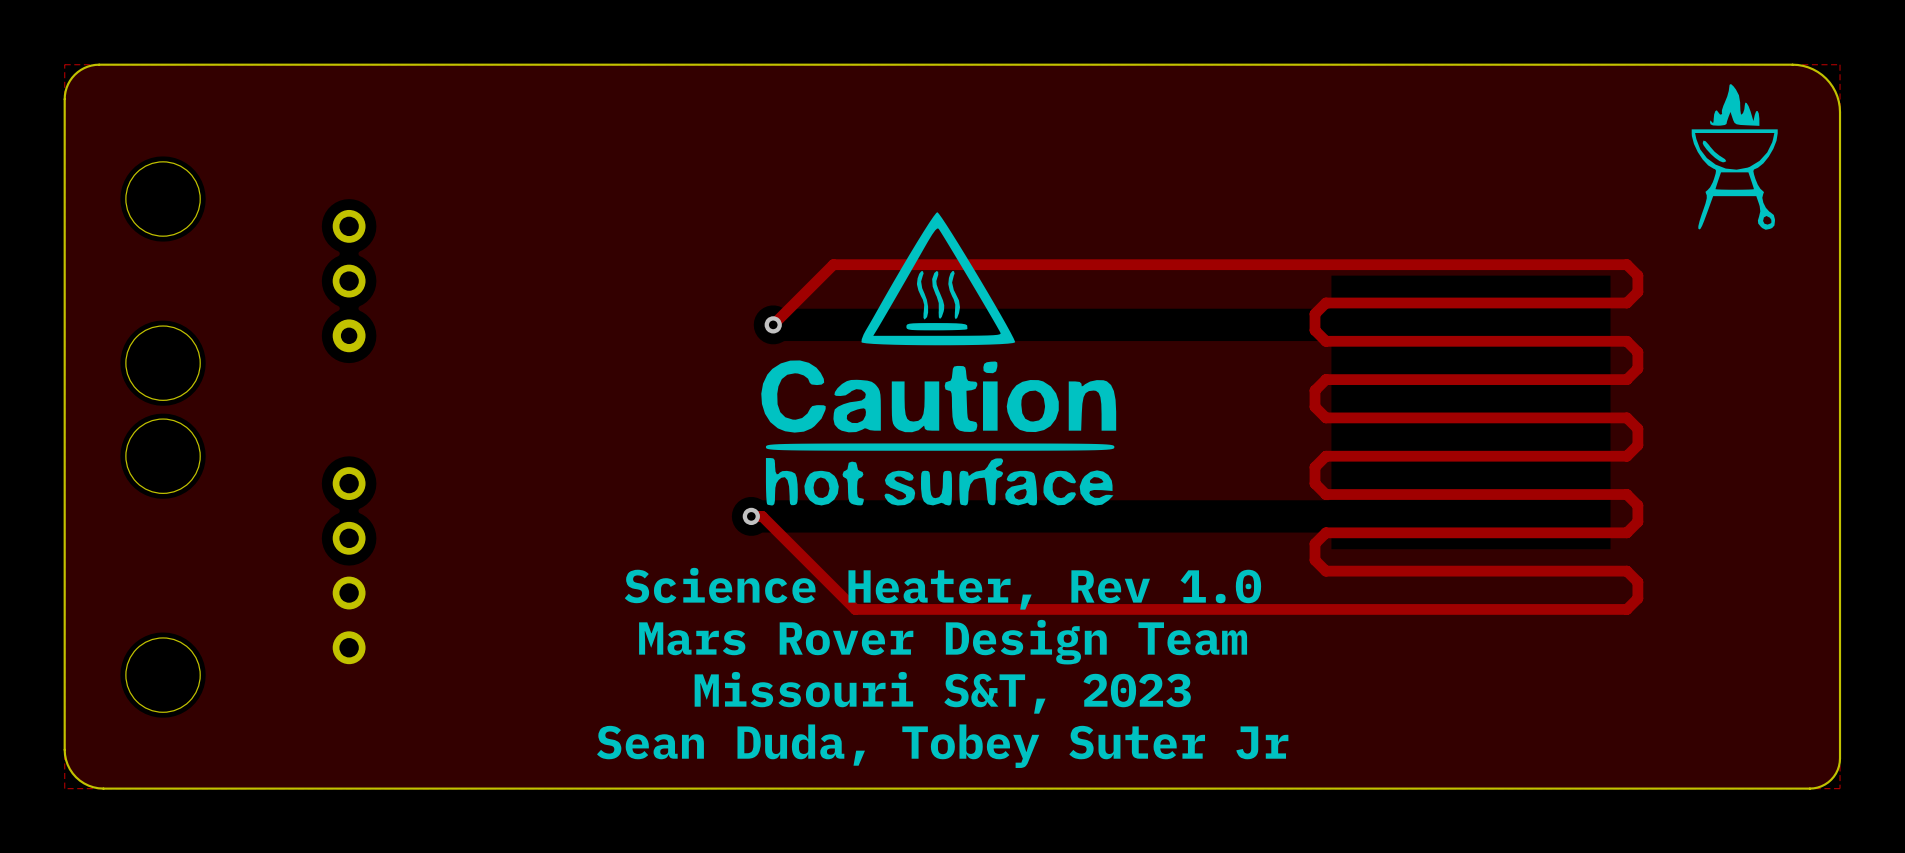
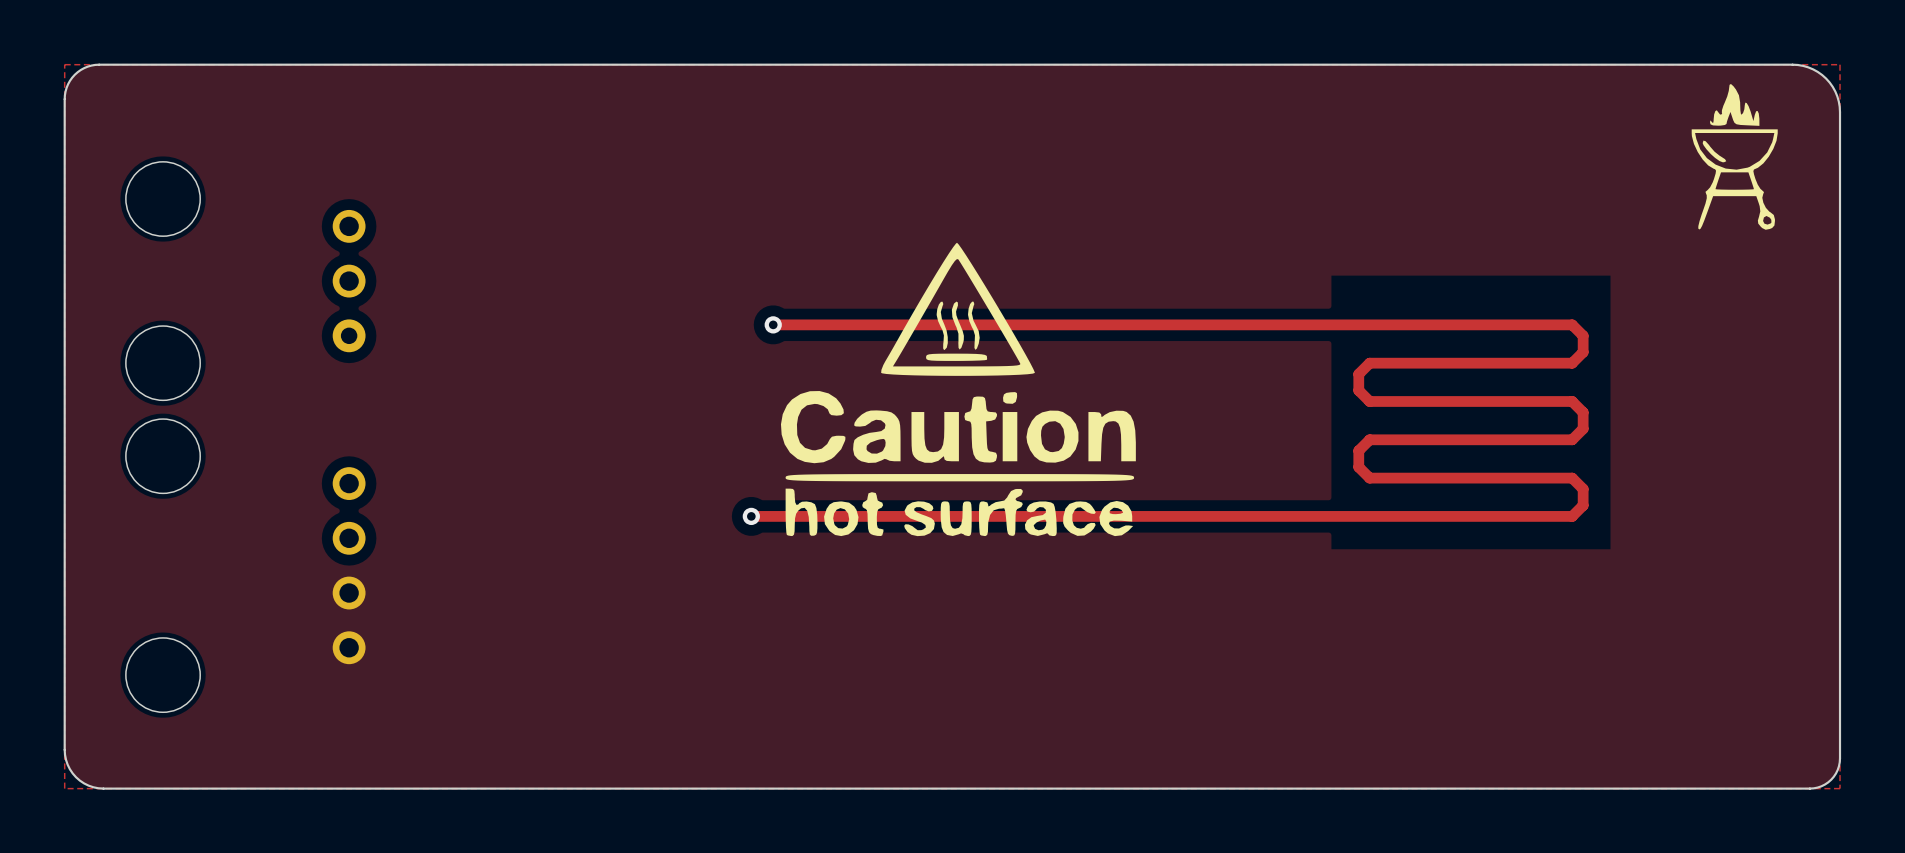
track: (773, 324) (833, 264) (1626, 264) (1637, 275) (1637, 292) (1626, 302) (1325, 302) (1315, 313) (1315, 330) (1325, 341) (1626, 341) (1637, 352) (1637, 368) (1626, 379) (1325, 379) (1315, 390) (1315, 406) (1325, 417) (1626, 417) (1637, 428) (1637, 445) (1626, 456) (1325, 456) (1315, 467) (1315, 483) (1325, 494) (1626, 494) (1637, 505) (1637, 521) (1626, 532) (1325, 532) (1315, 543) (1315, 560) (1325, 571) (1626, 571) (1637, 582) (1637, 598) (1626, 609) (855, 609) (762, 516) -> (773, 324) (1572, 324) (1583, 335) (1583, 352) (1572, 363) (1369, 363) (1358, 374) (1358, 390) (1369, 401) (1572, 401) (1583, 412) (1583, 428) (1572, 439) (1369, 439) (1358, 450) (1358, 467) (1369, 478) (1572, 478) (1583, 489) (1583, 505) (1572, 516) (762, 516)
drawing position: (938, 358) -> (958, 389)
text: Science Heater, Rev 1.0 (942, 588) -> none
text: Mars Rover Design Team (943, 642) -> none
text: Missouri S&T, 2023 (942, 692) -> none
text: Sean Duda, Tobey Suter Jr (942, 746) -> none

